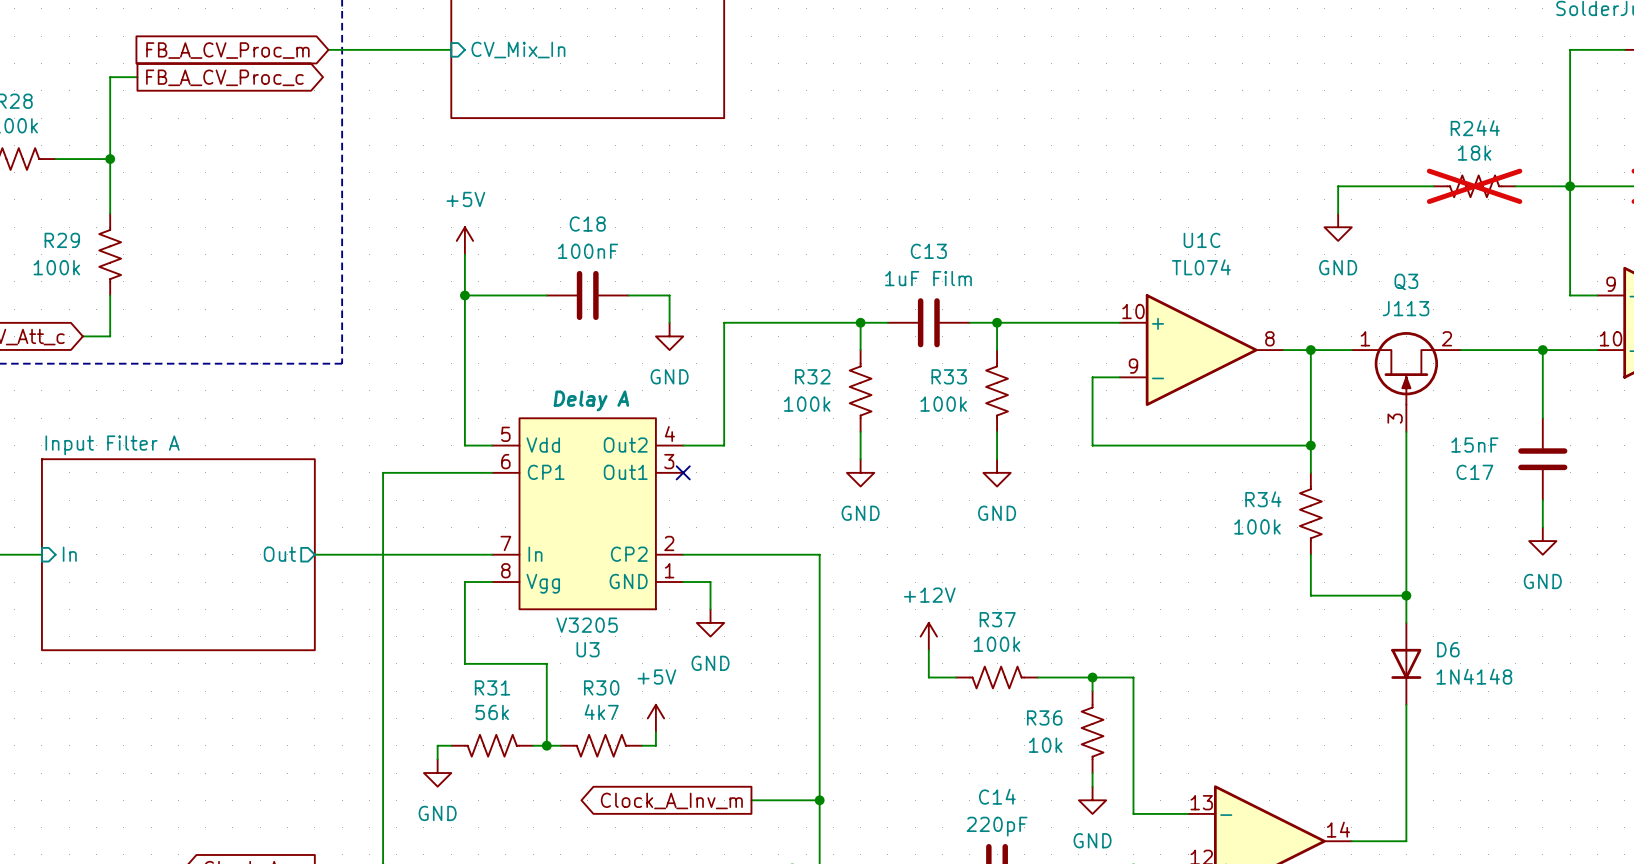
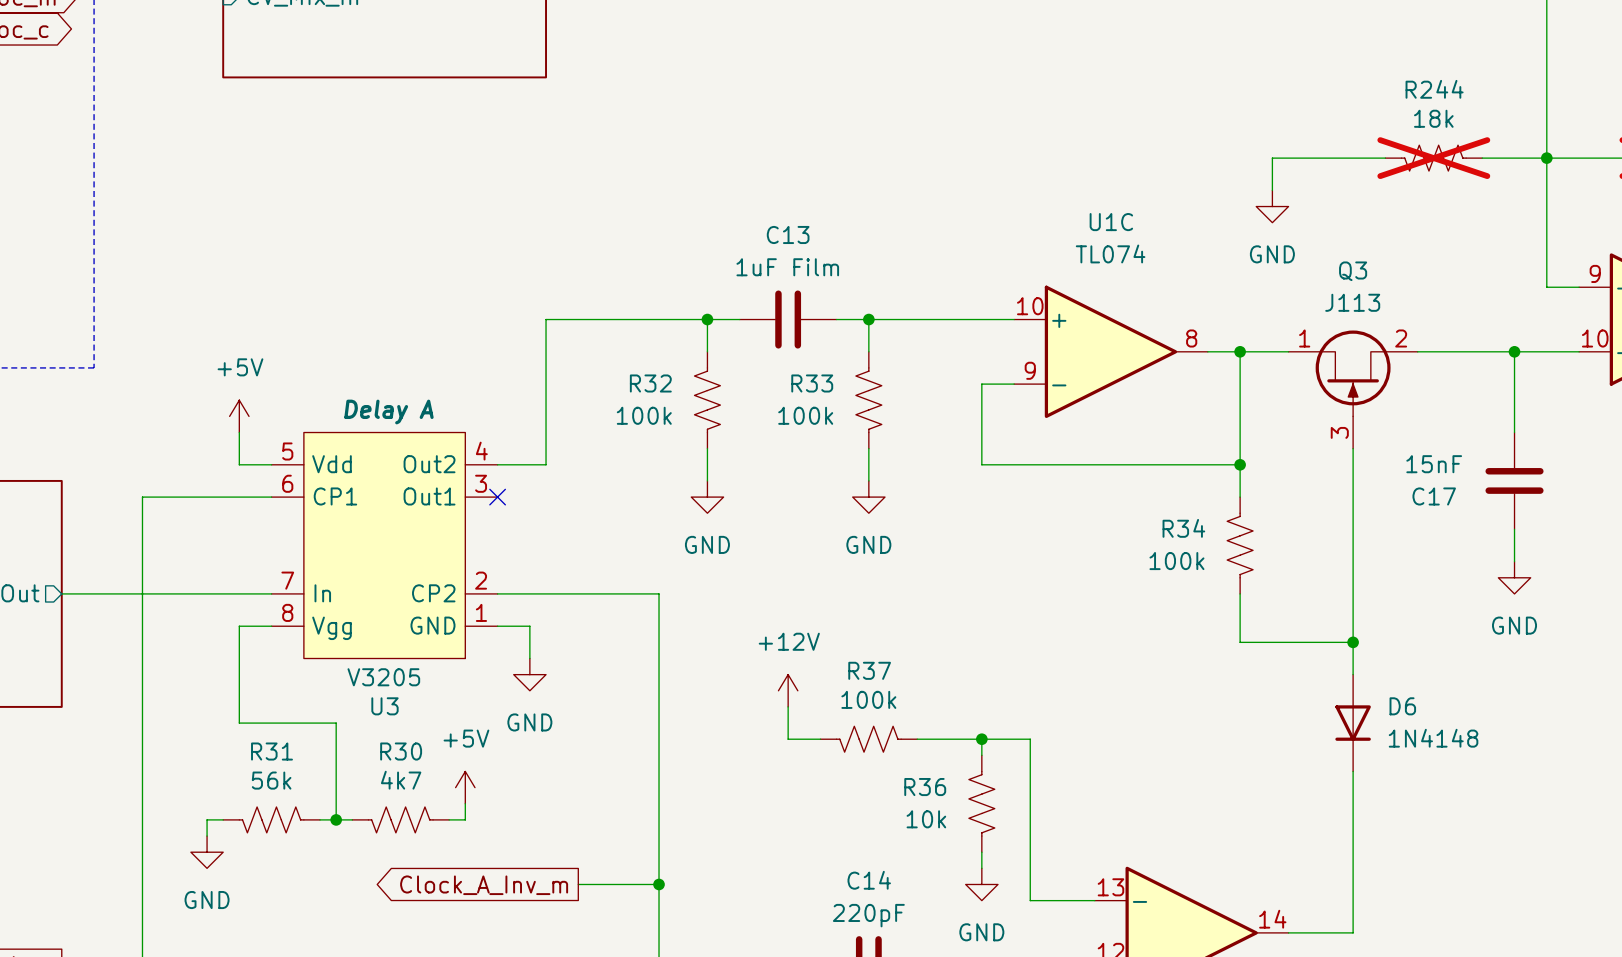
power symbol position: +5V (464, 240) -> +5V (239, 416)
wire: (464, 254) (464, 418) -> none
wire: (464, 295) (546, 295) -> none
junction: (464, 295) -> none
C18: 100nF (587, 295) -> none
wire: (628, 295) (669, 295) (669, 322) -> none
power symbol: GND (669, 336) -> none

